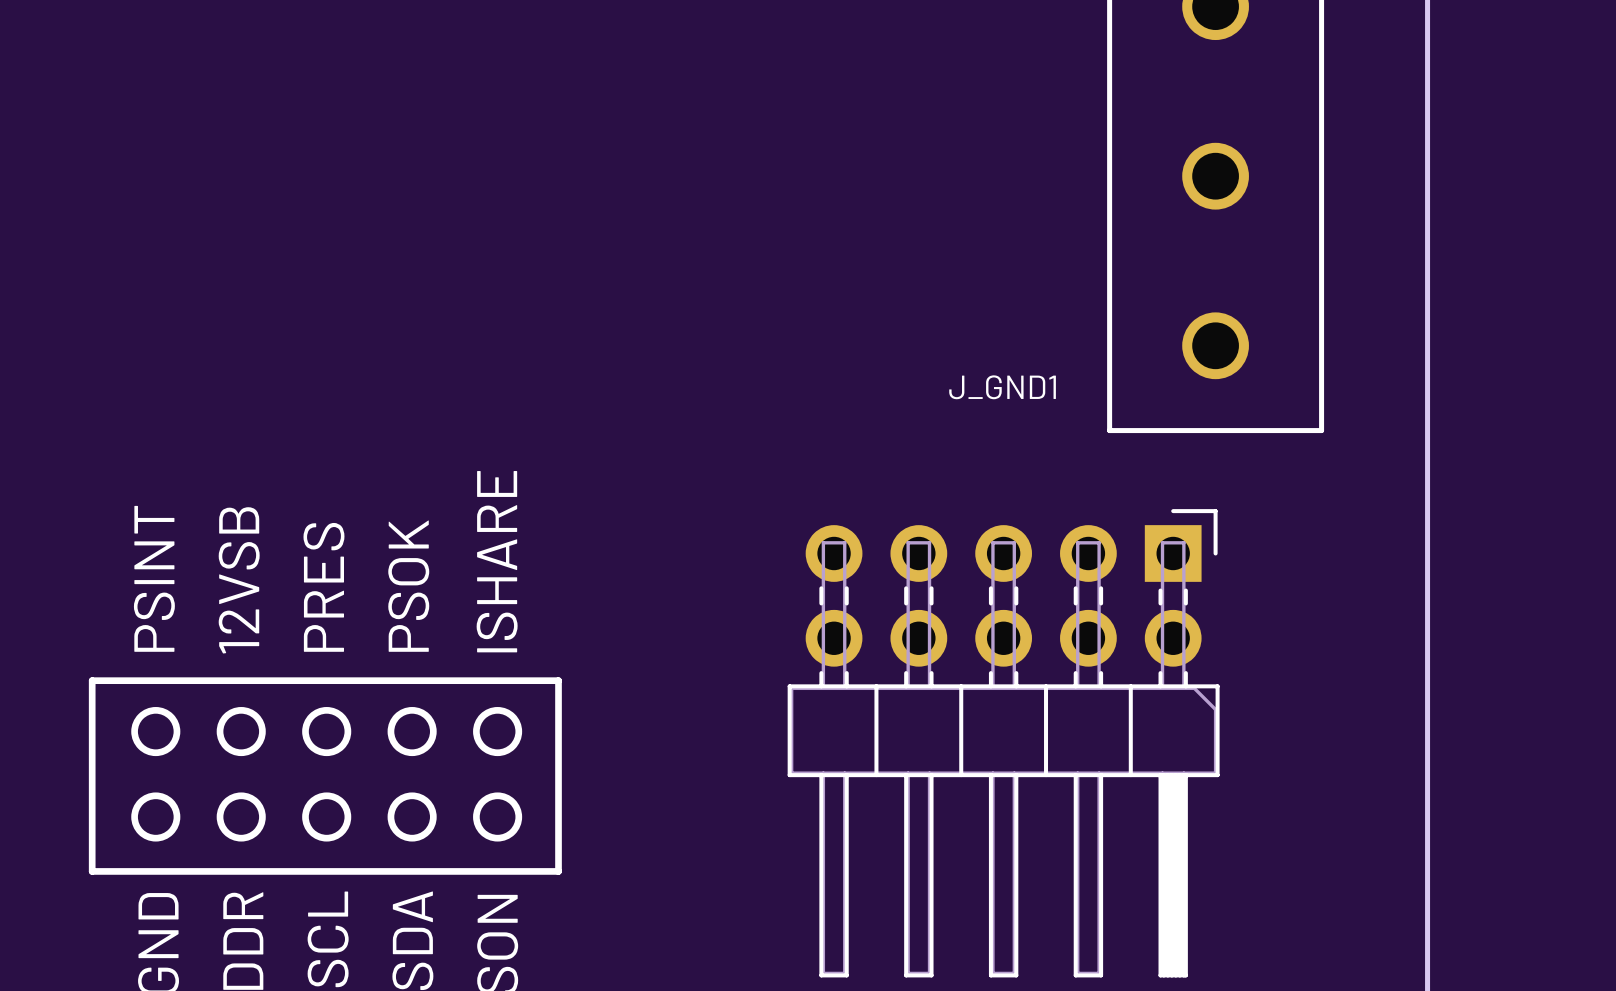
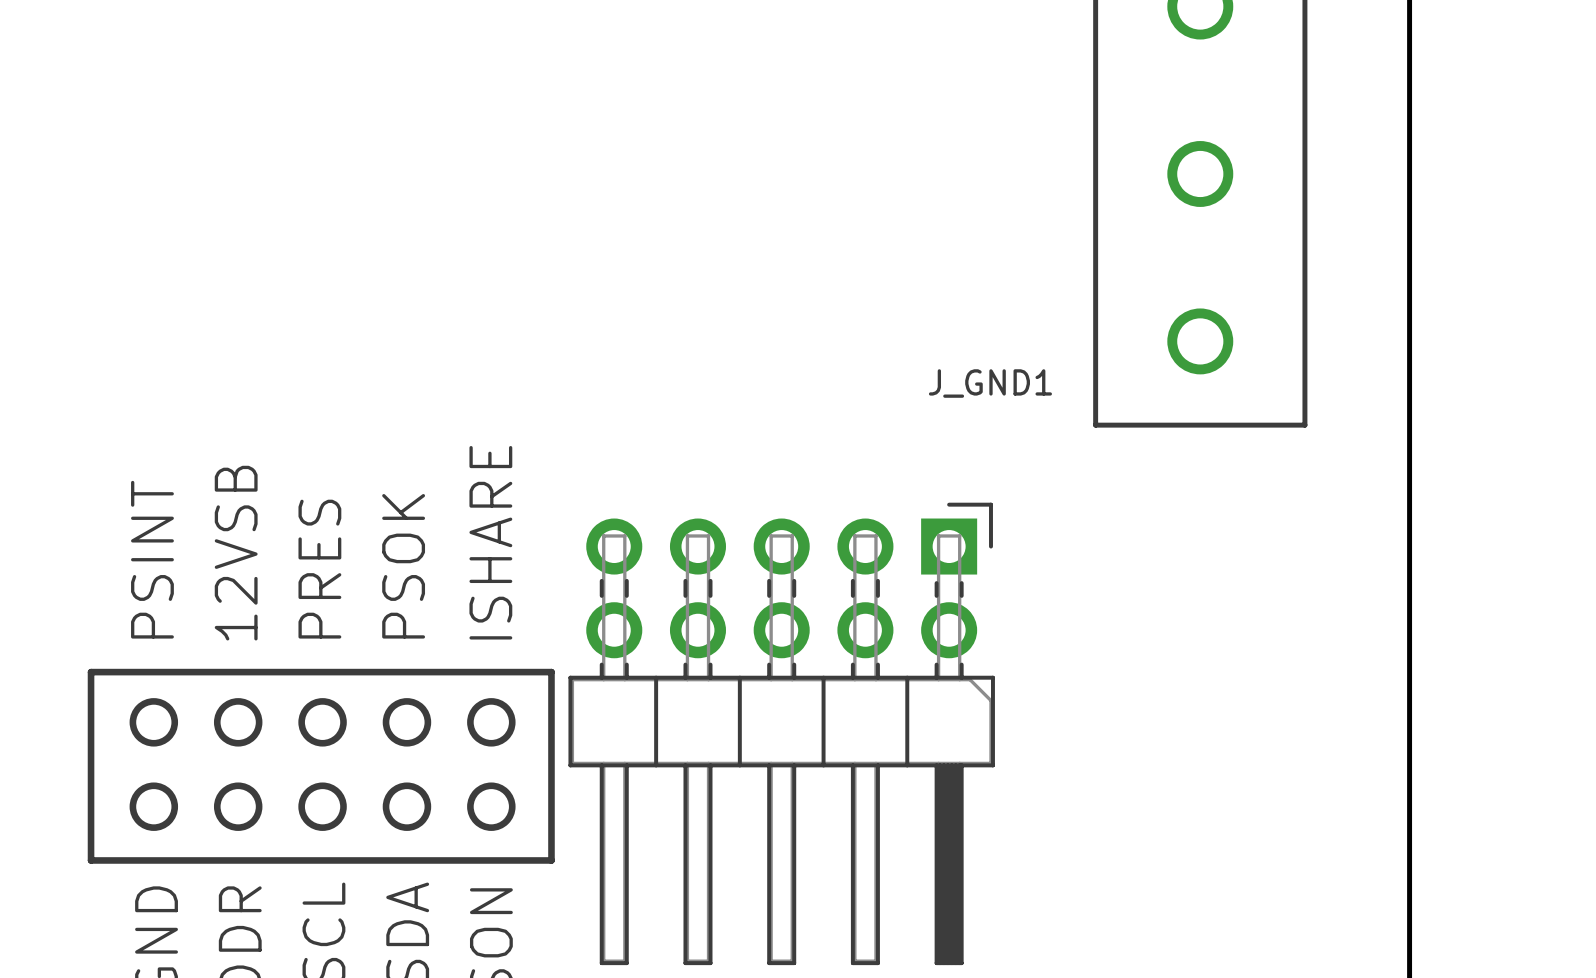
part position: (1003, 743) -> (781, 733)

